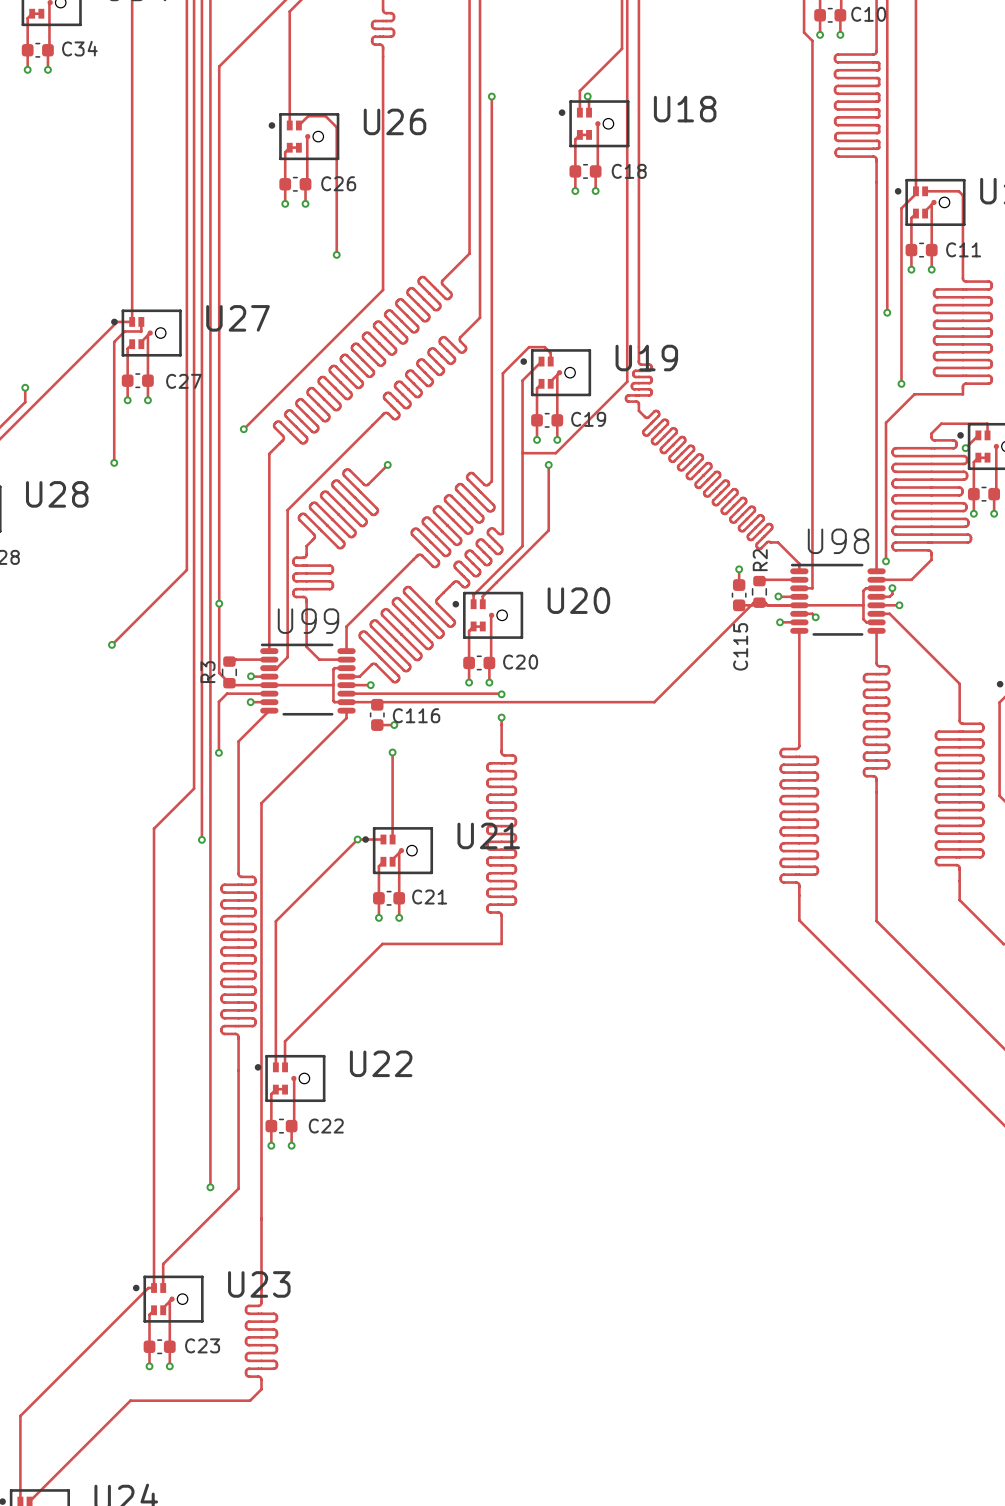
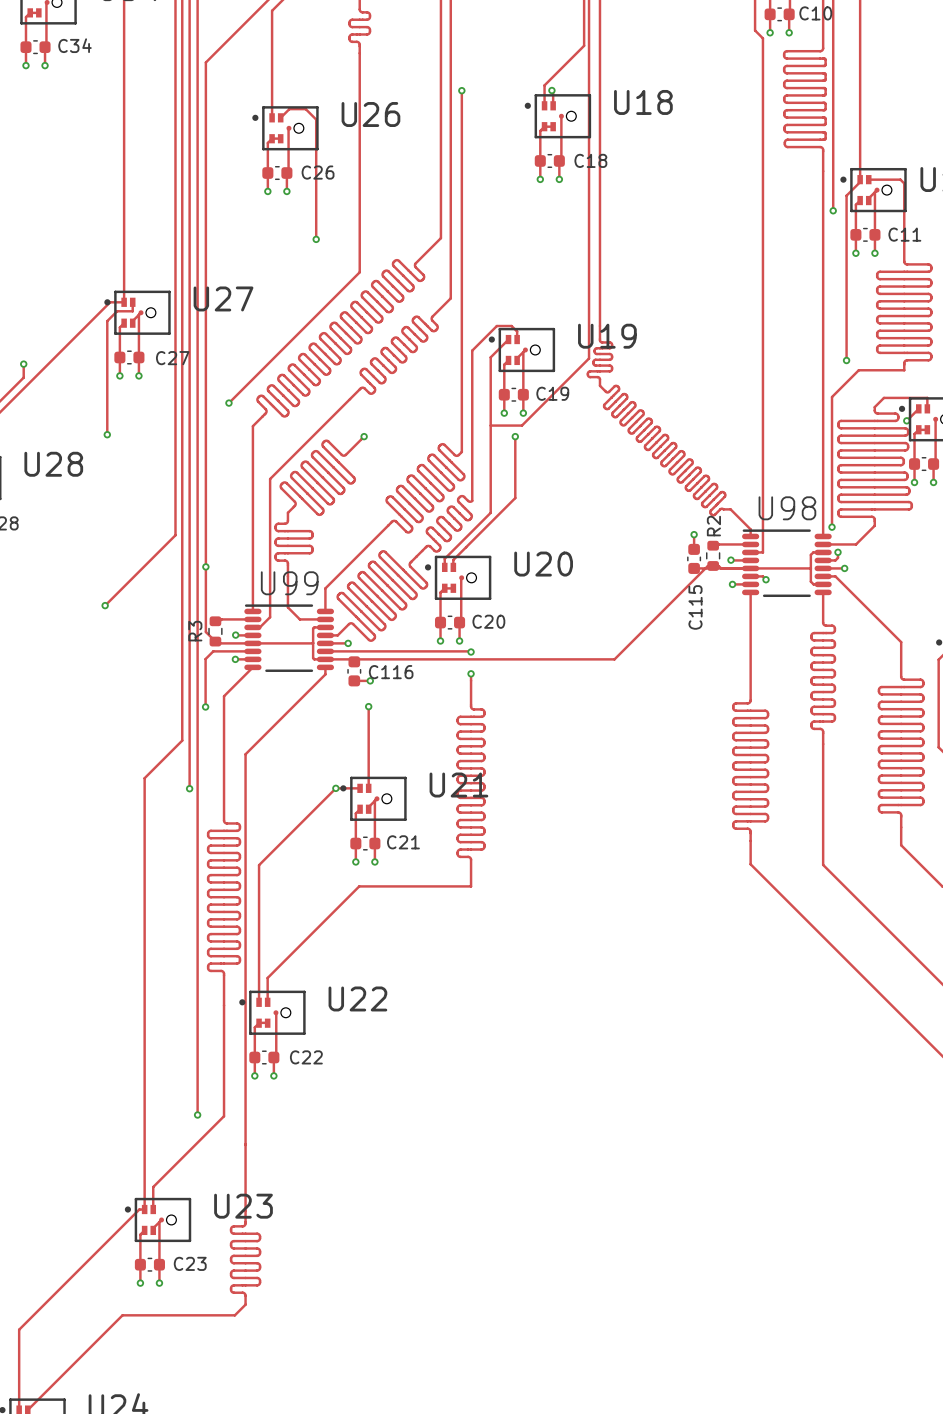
track: (887, 224) (887, 312) -> none
via: none -> (833, 210)
via: (887, 312) -> none

